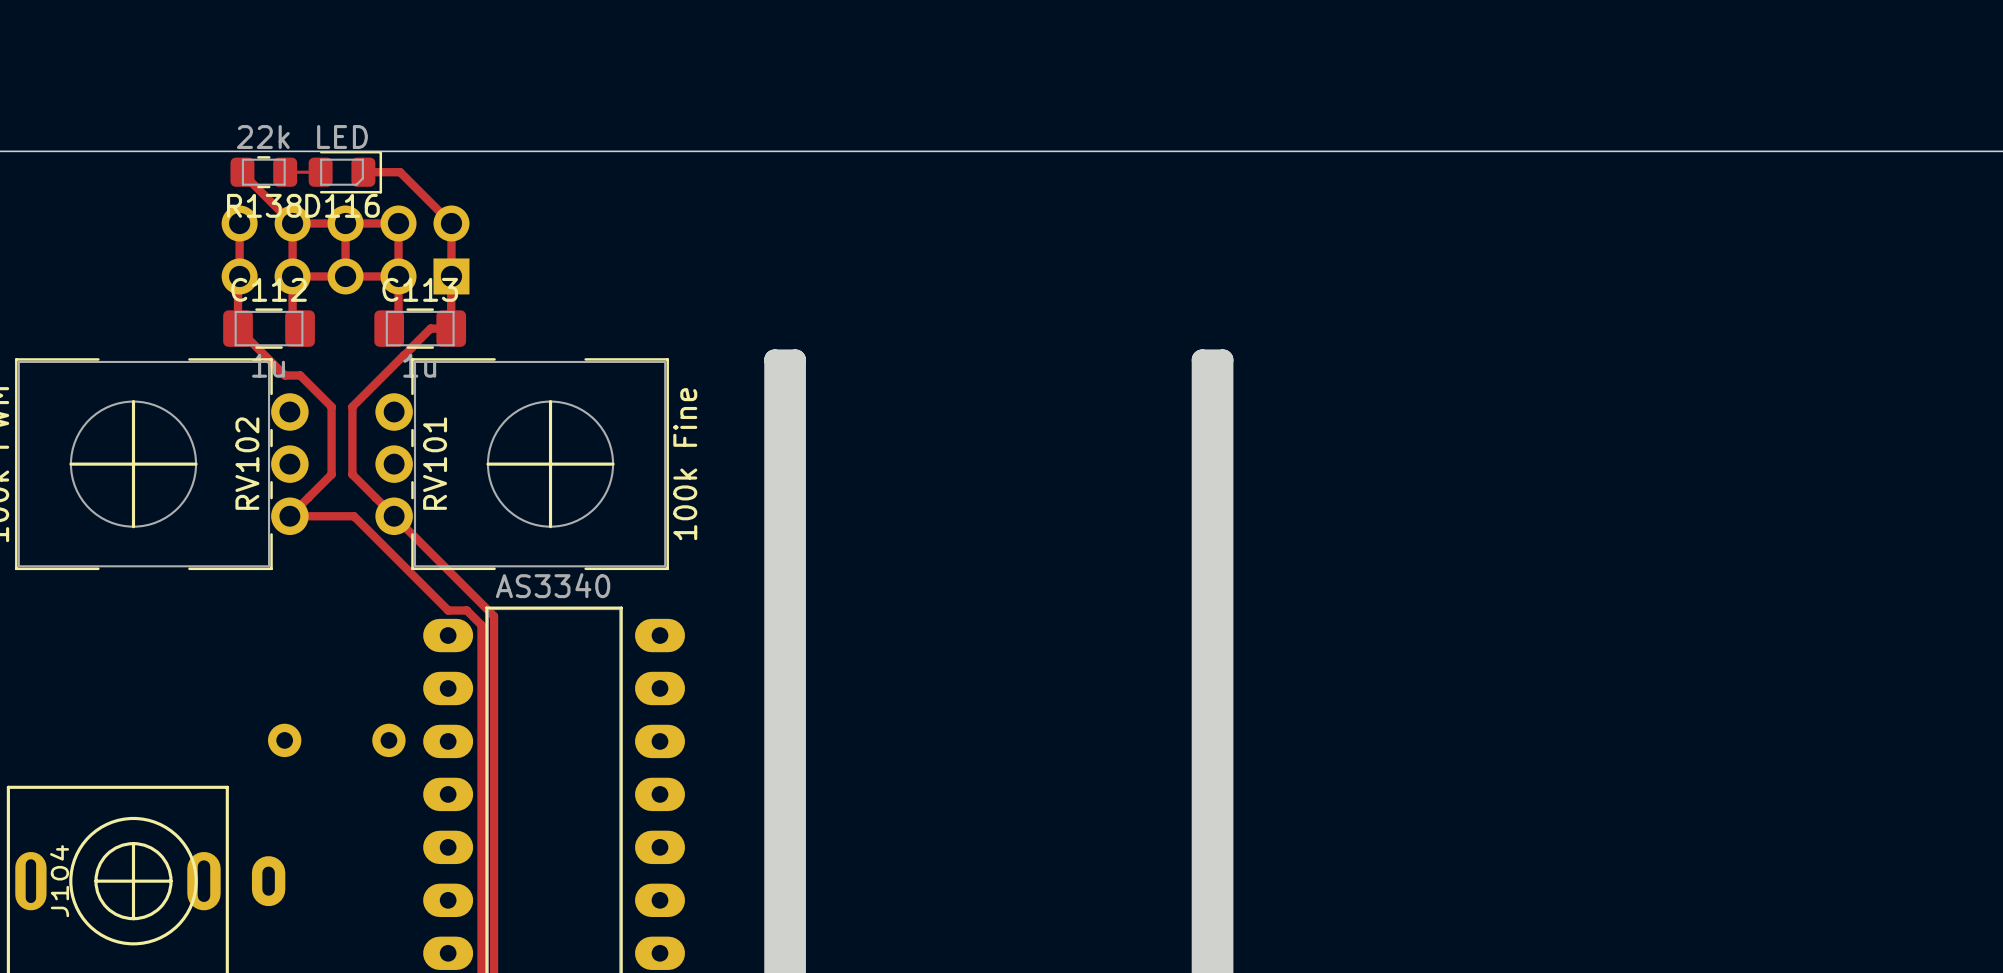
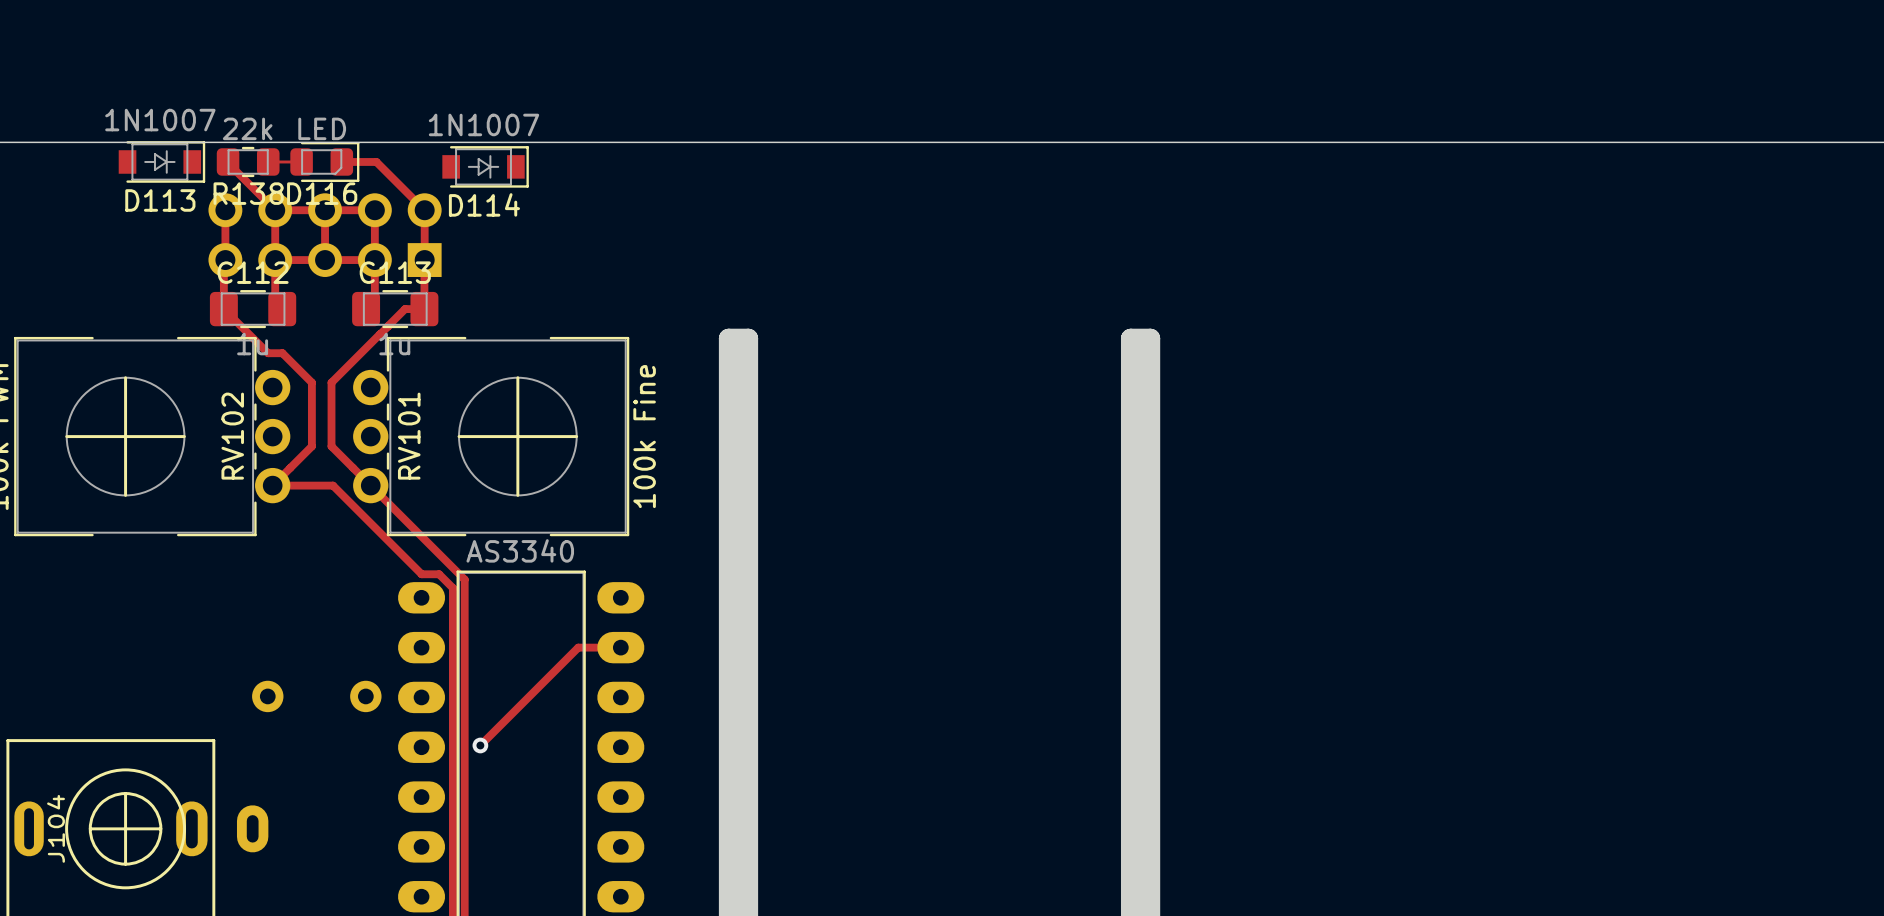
D113: none -> 1N1007 (161, 161)
D114: none -> 1N1007 (485, 166)
track: none -> (620, 647) (578, 647) (480, 745)
via: none -> (480, 745)

